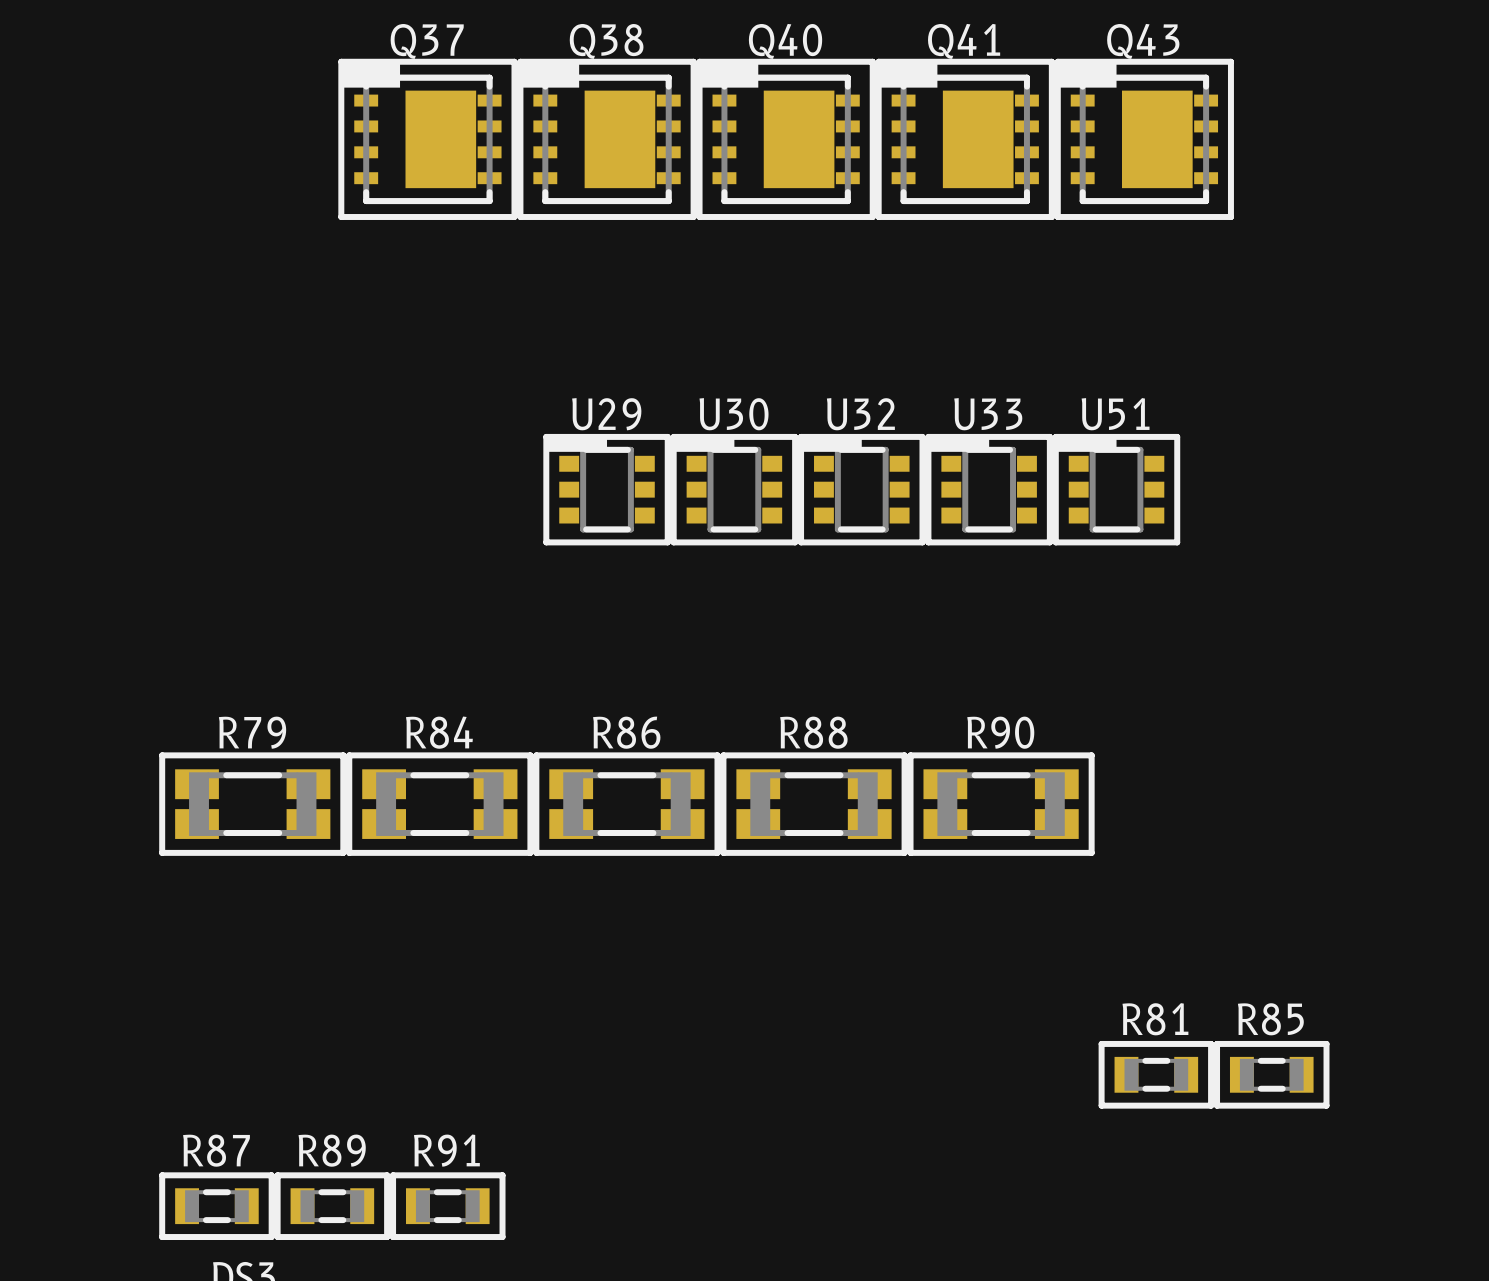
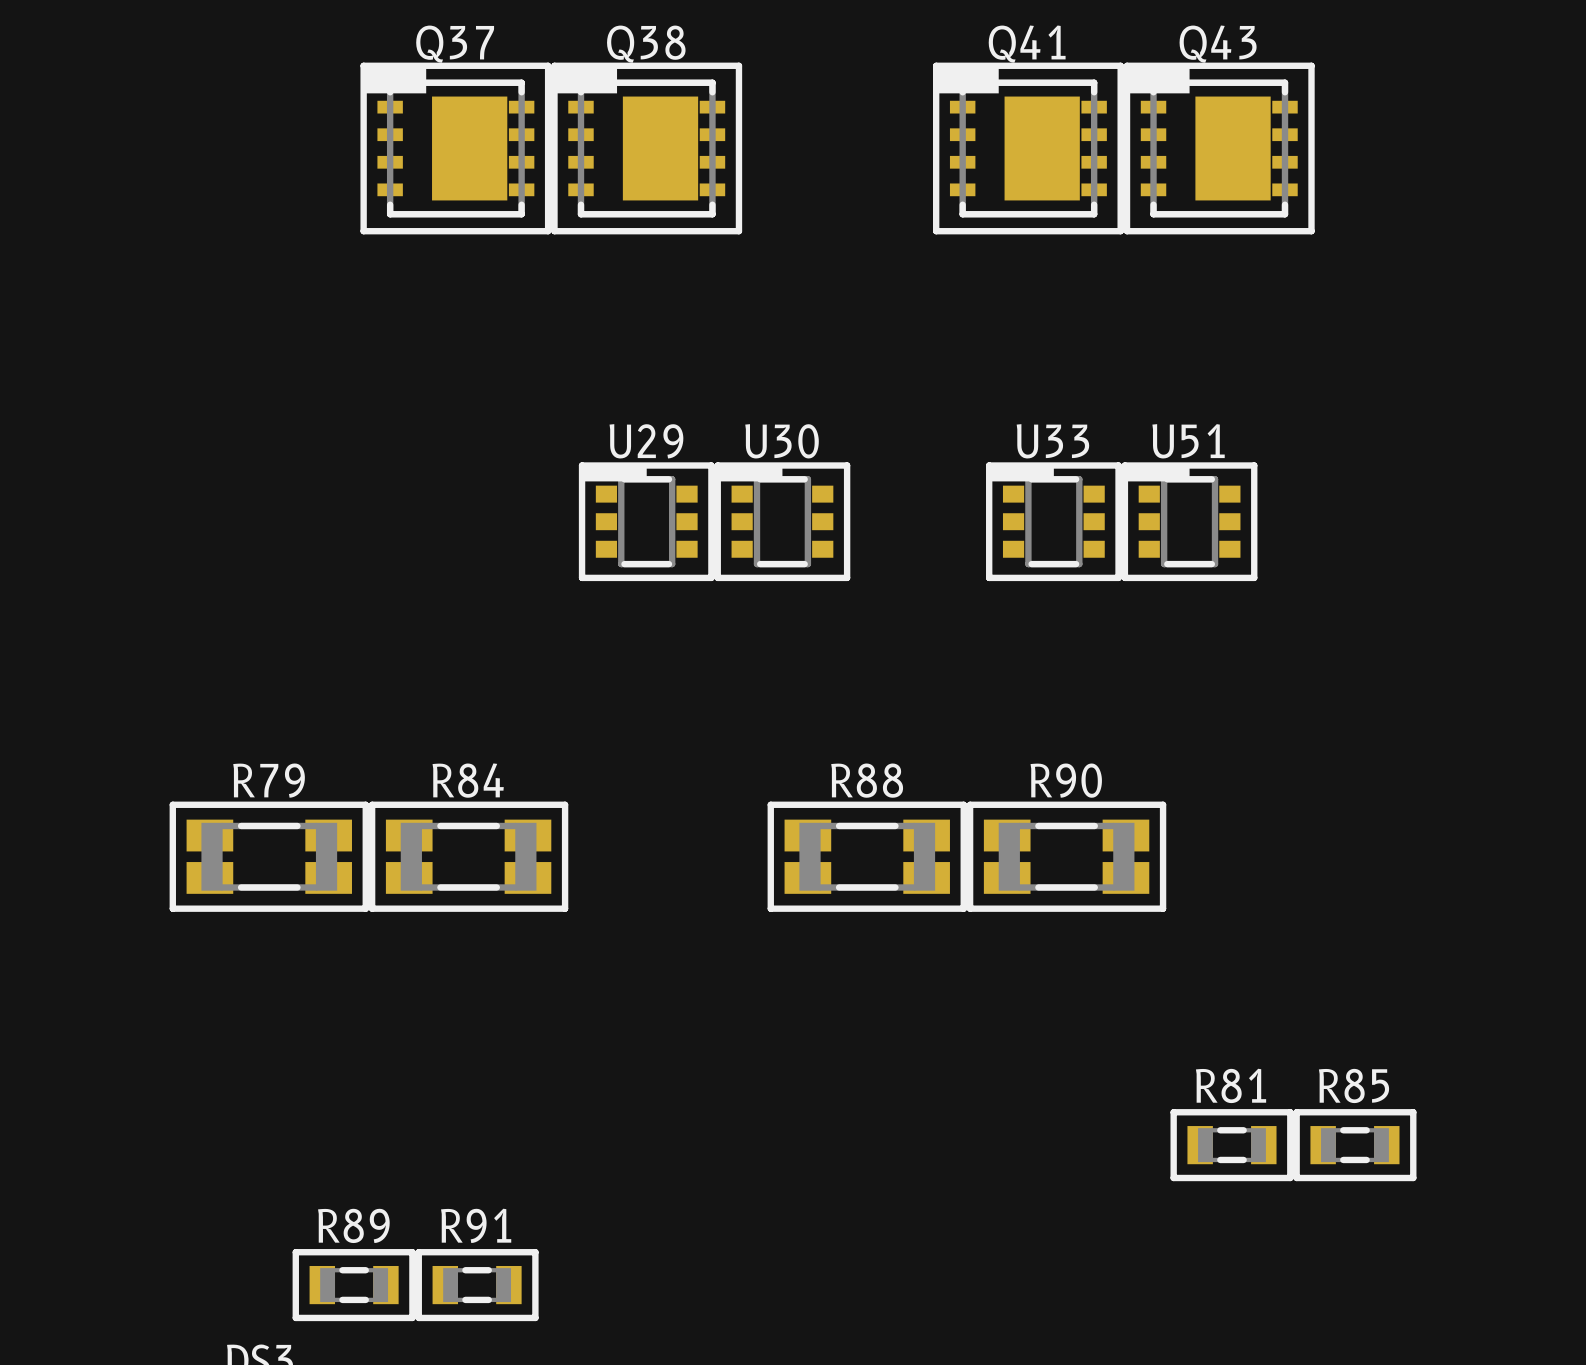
Q40: (786, 139) -> none
U32: (861, 489) -> none
R86: (626, 804) -> none
R87: (216, 1206) -> none

